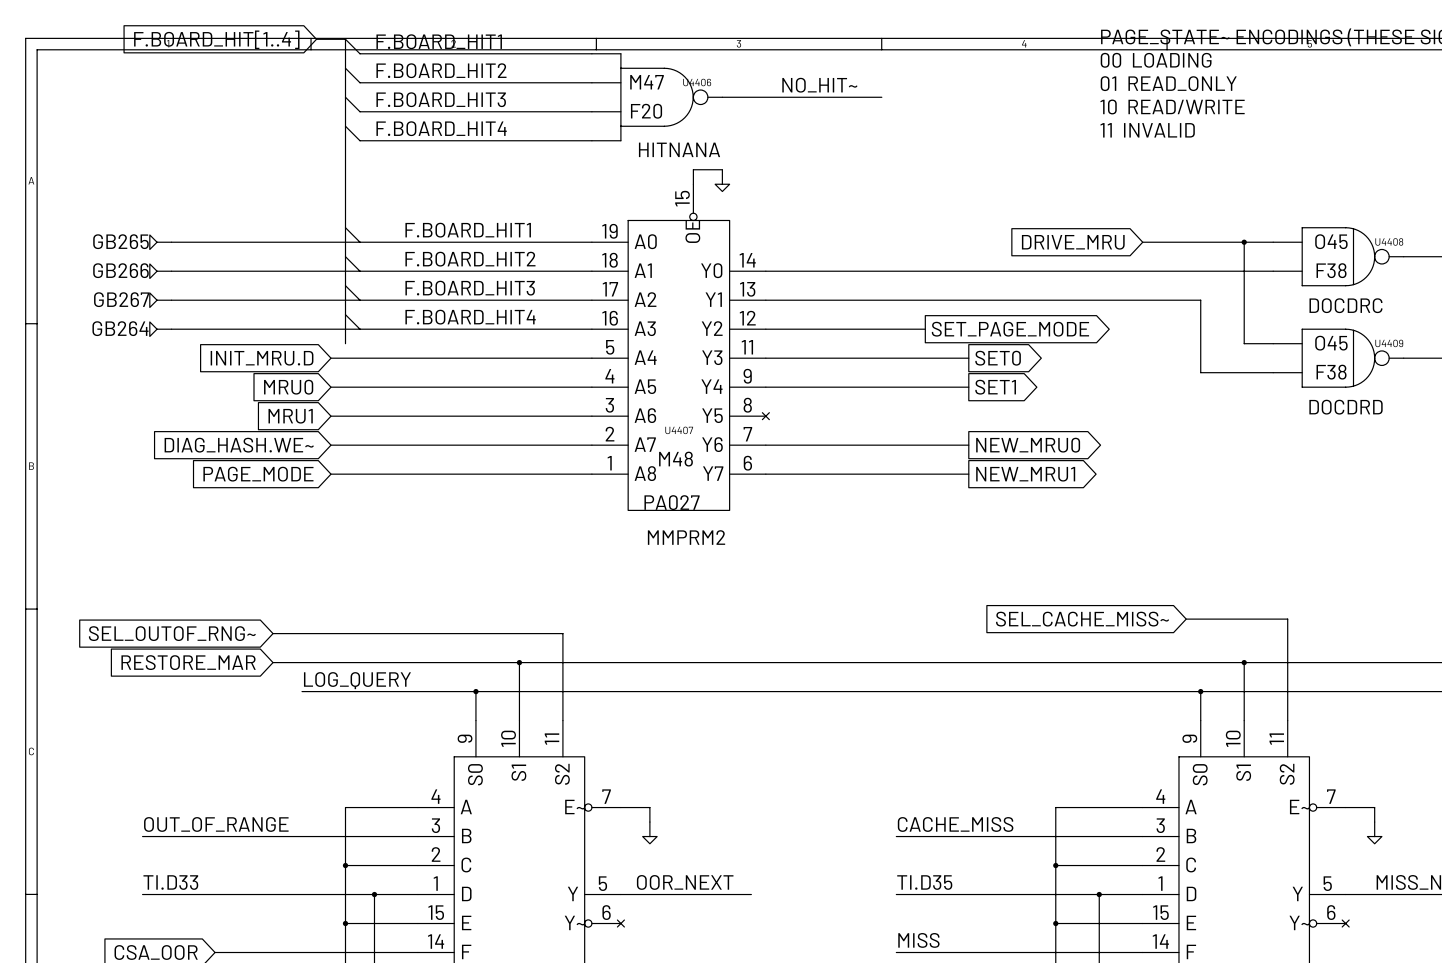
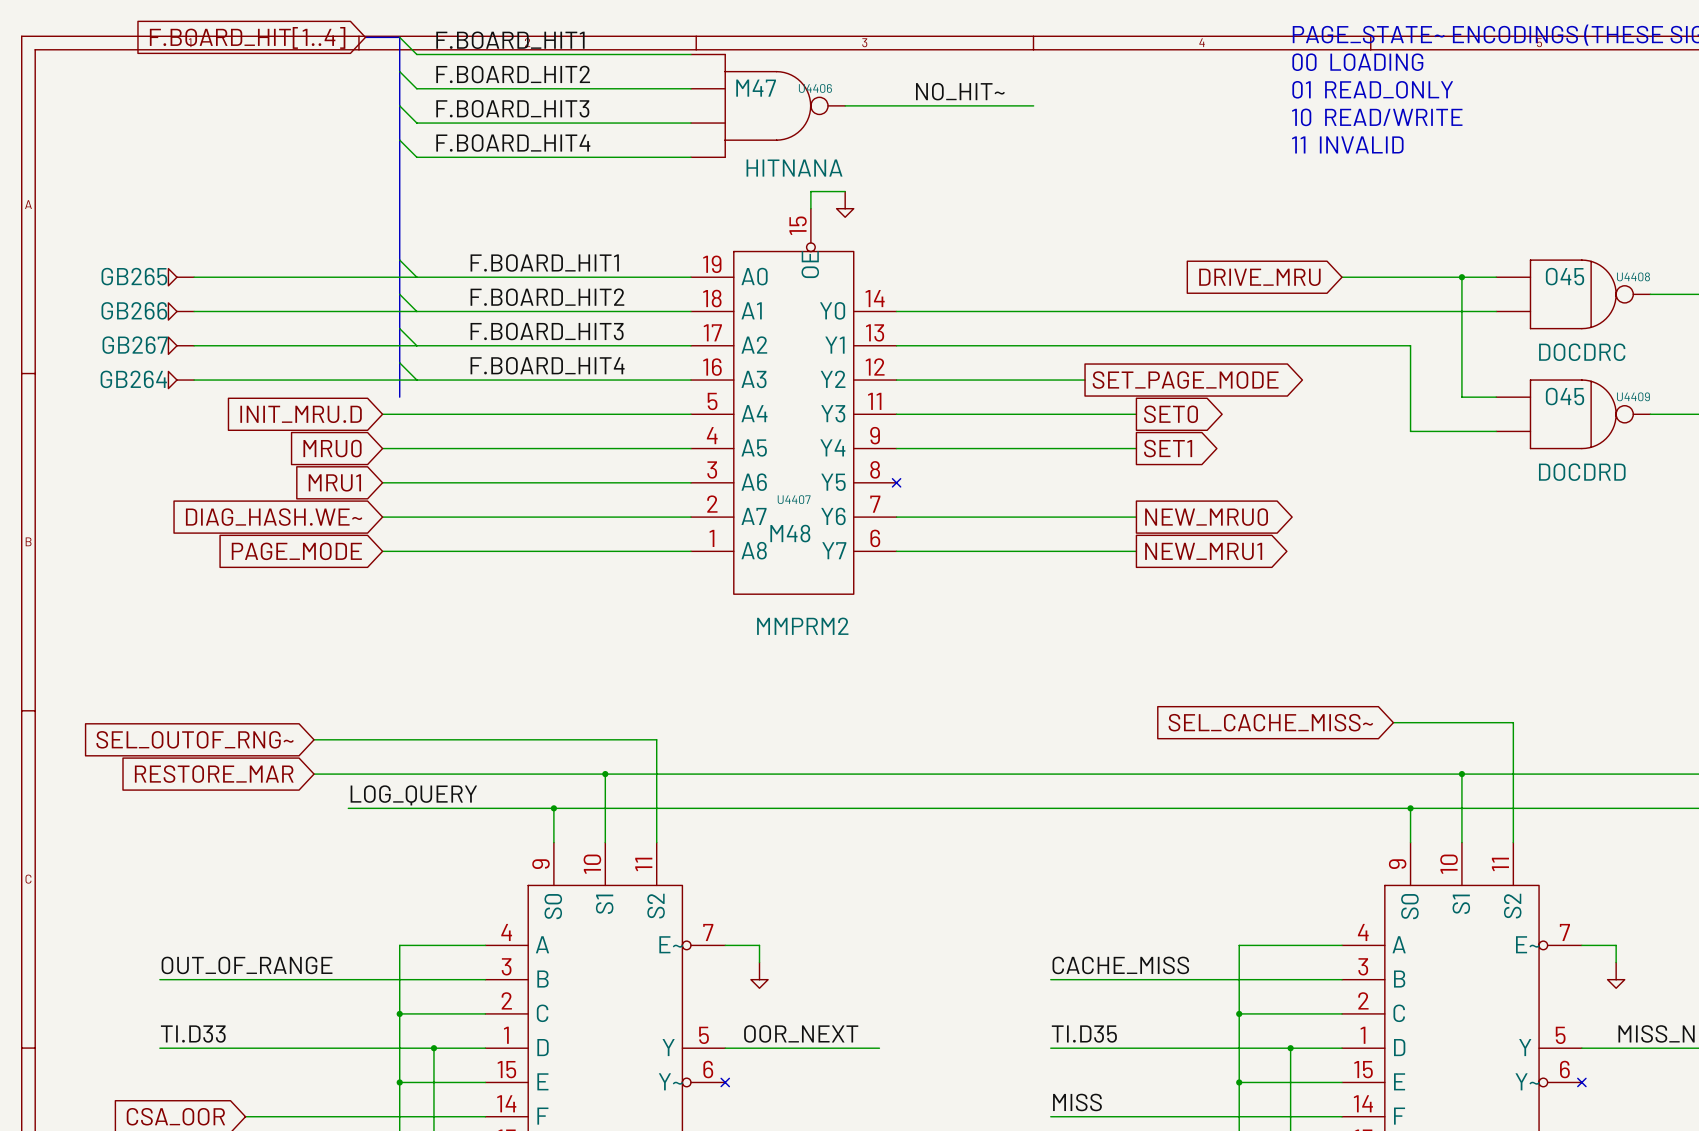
U4406 value: F20 (646, 111) -> none
U4408 value: F38 (1331, 270) -> none
U4409 value: F38 (1331, 372) -> none
U4407 value: PA027 (672, 502) -> none

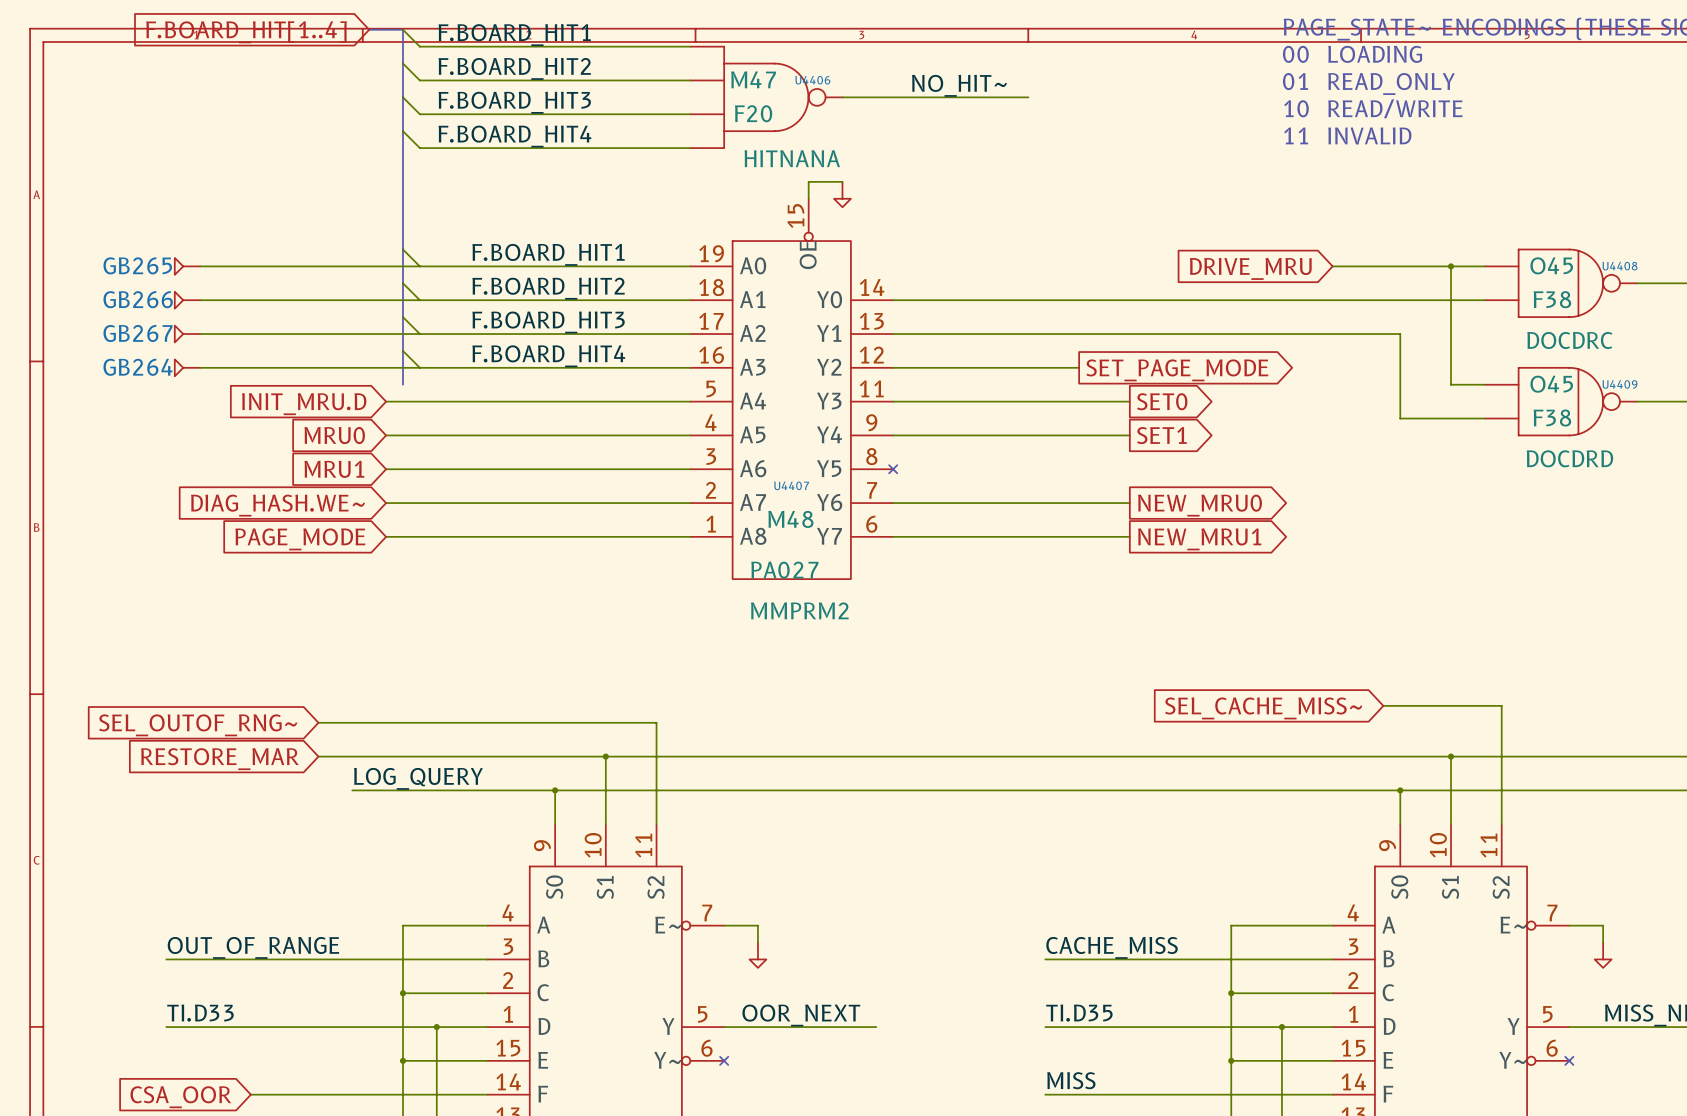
U4406 value: none -> F20 (753, 113)
U4408 value: none -> F38 (1552, 299)
U4409 value: none -> F38 (1552, 418)
U4407 value: none -> PA027 (784, 570)

